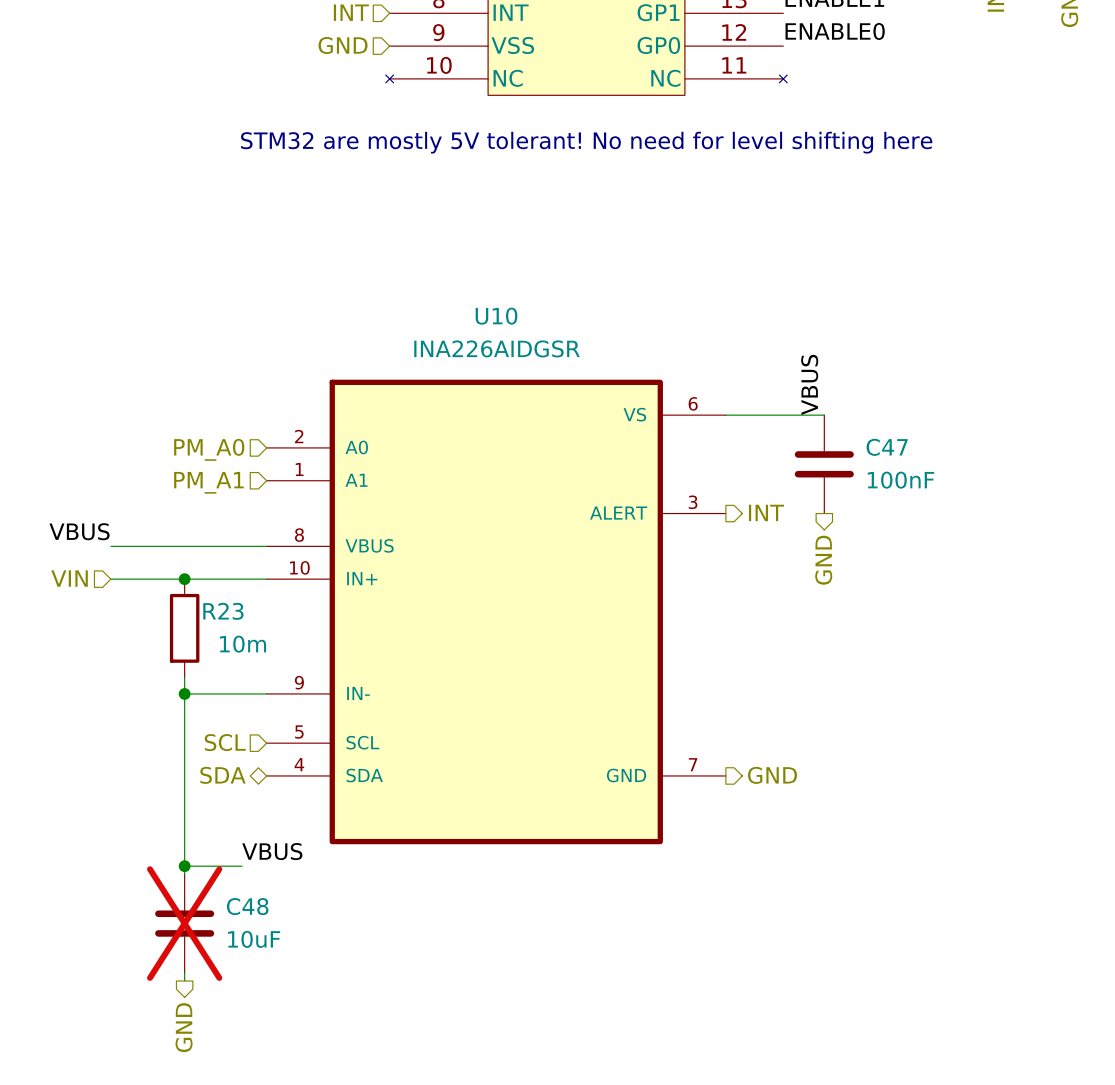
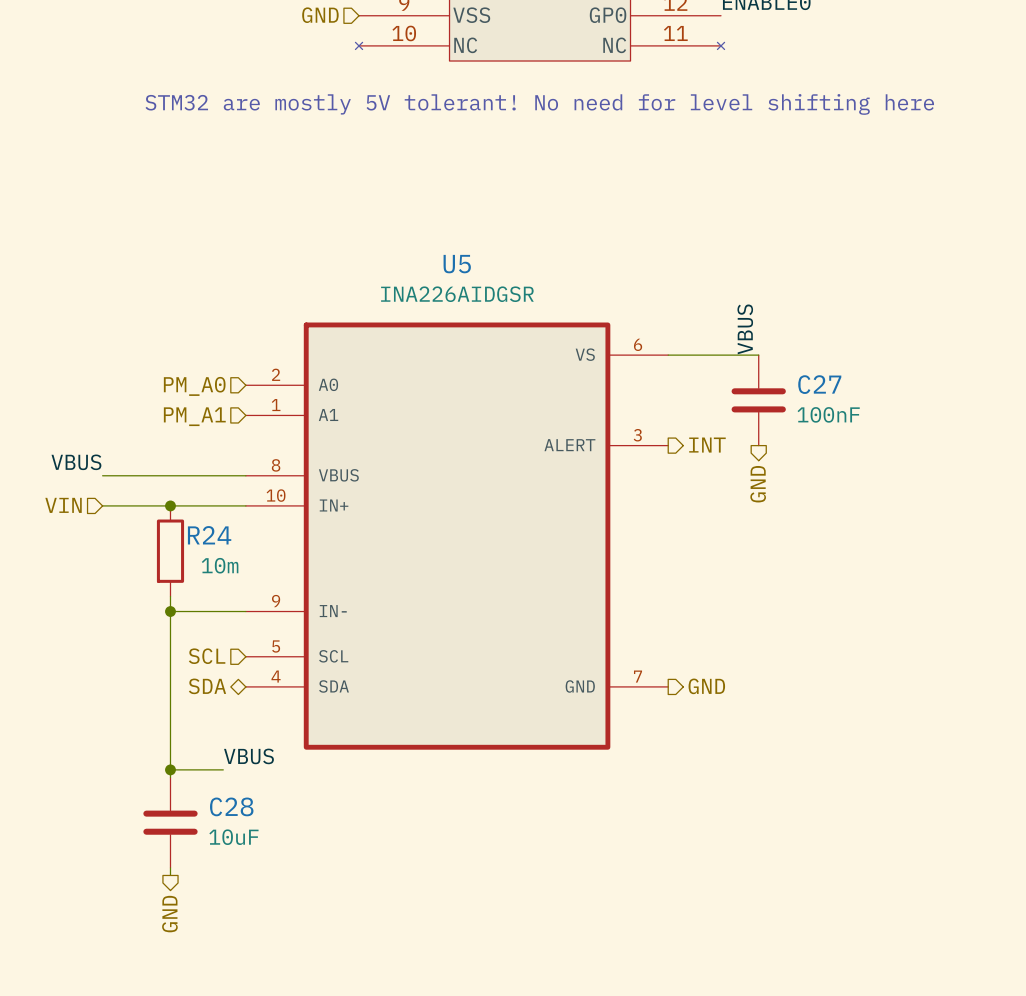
U10 name: U10 (496, 316) -> U5 (457, 264)
C47 name: C47 (887, 447) -> C27 (819, 384)
R23 name: R23 (223, 611) -> R24 (209, 535)
C48 name: C48 (247, 906) -> C28 (231, 806)
C48 do-not-place cross: (184, 923) -> none

